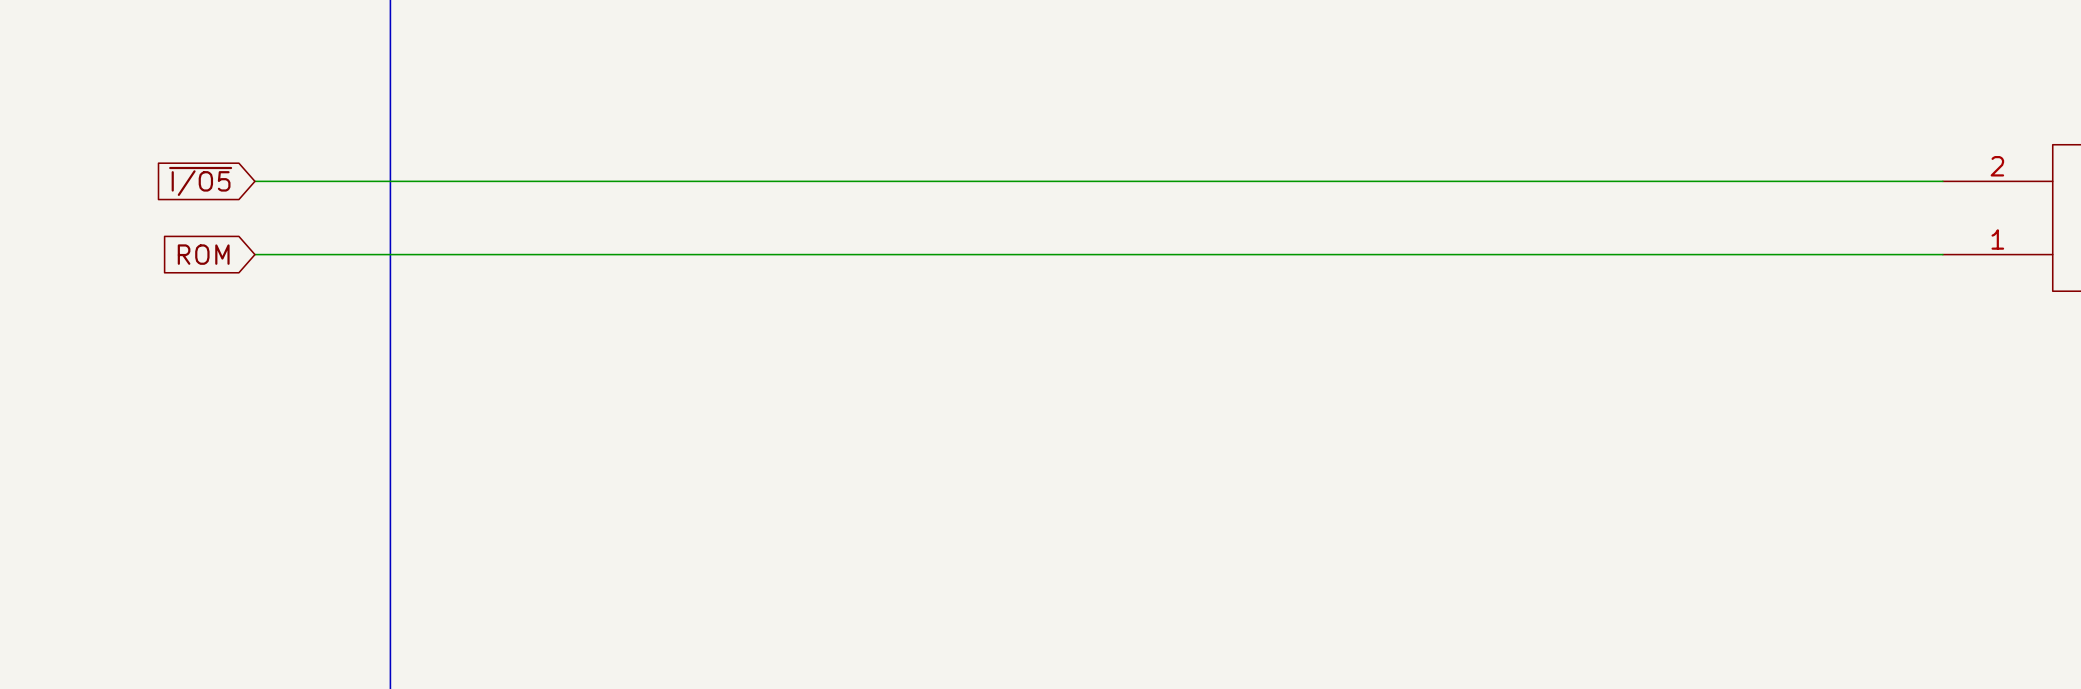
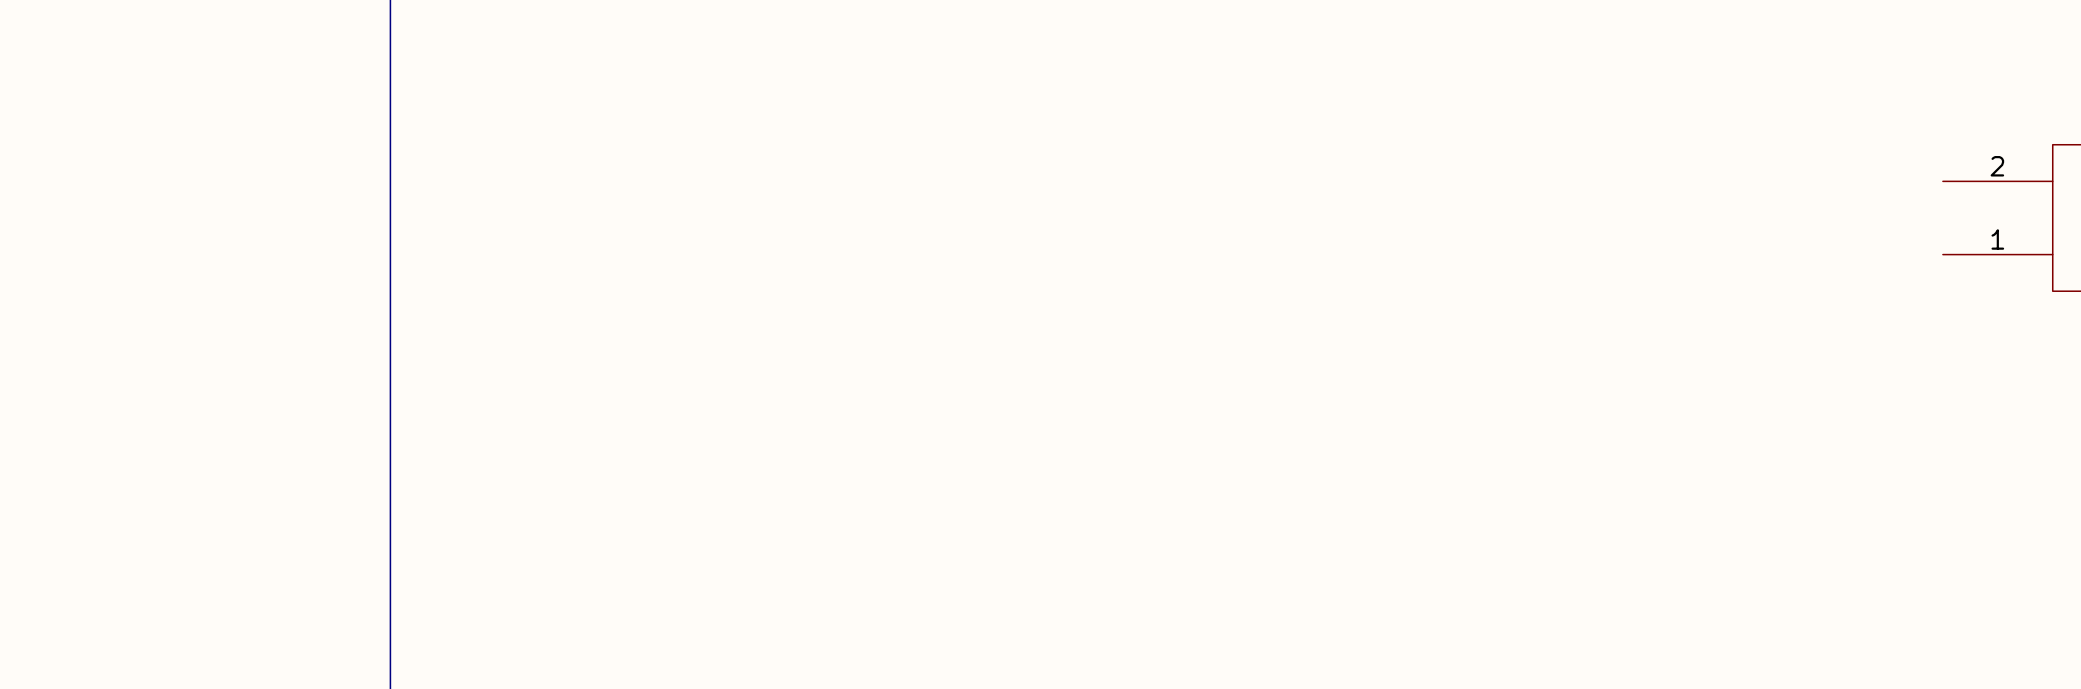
global label: ~{I/O5} (200, 181) -> none
wire: (254, 181) (1942, 181) -> none
global label: ROM (203, 254) -> none
wire: (254, 254) (1942, 254) -> none

